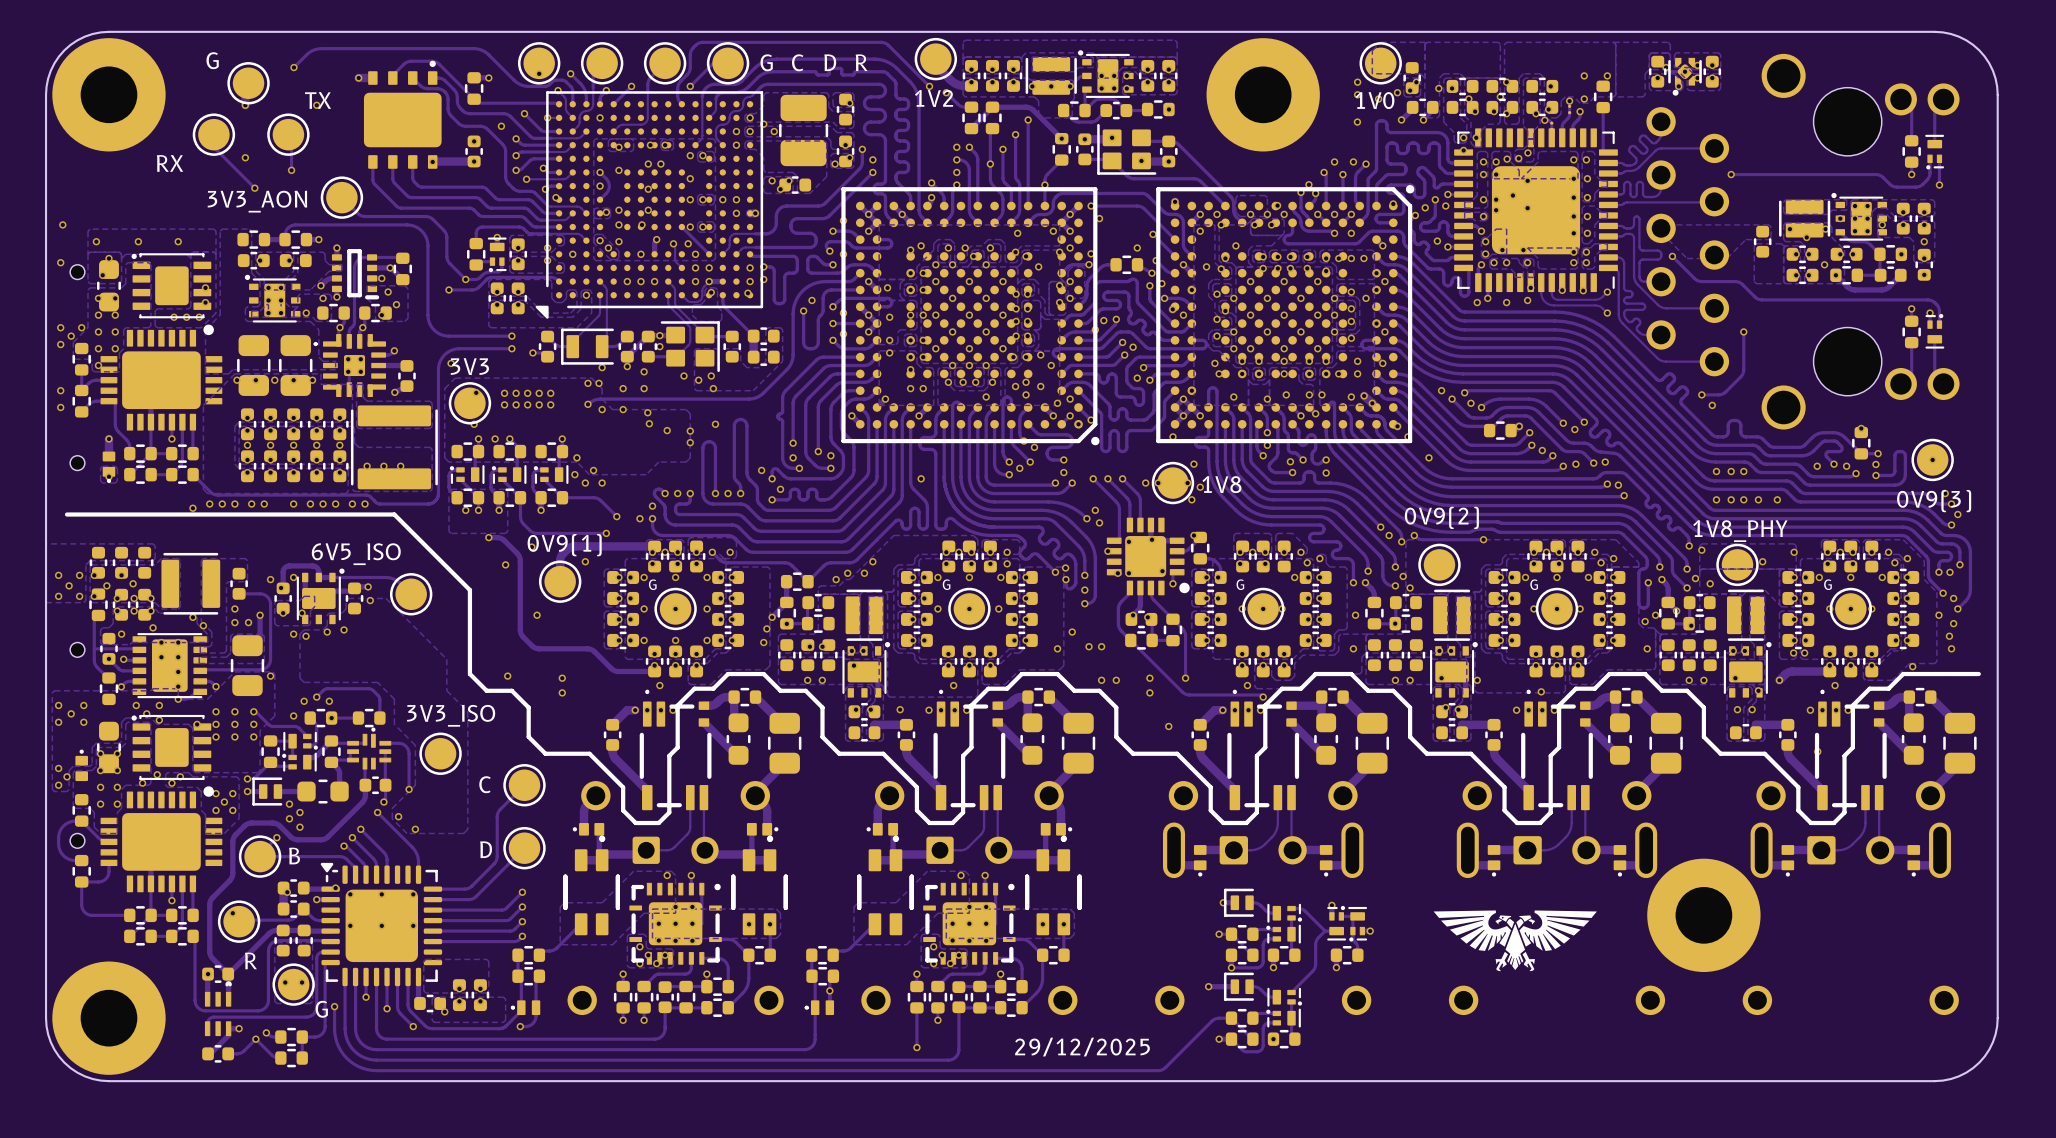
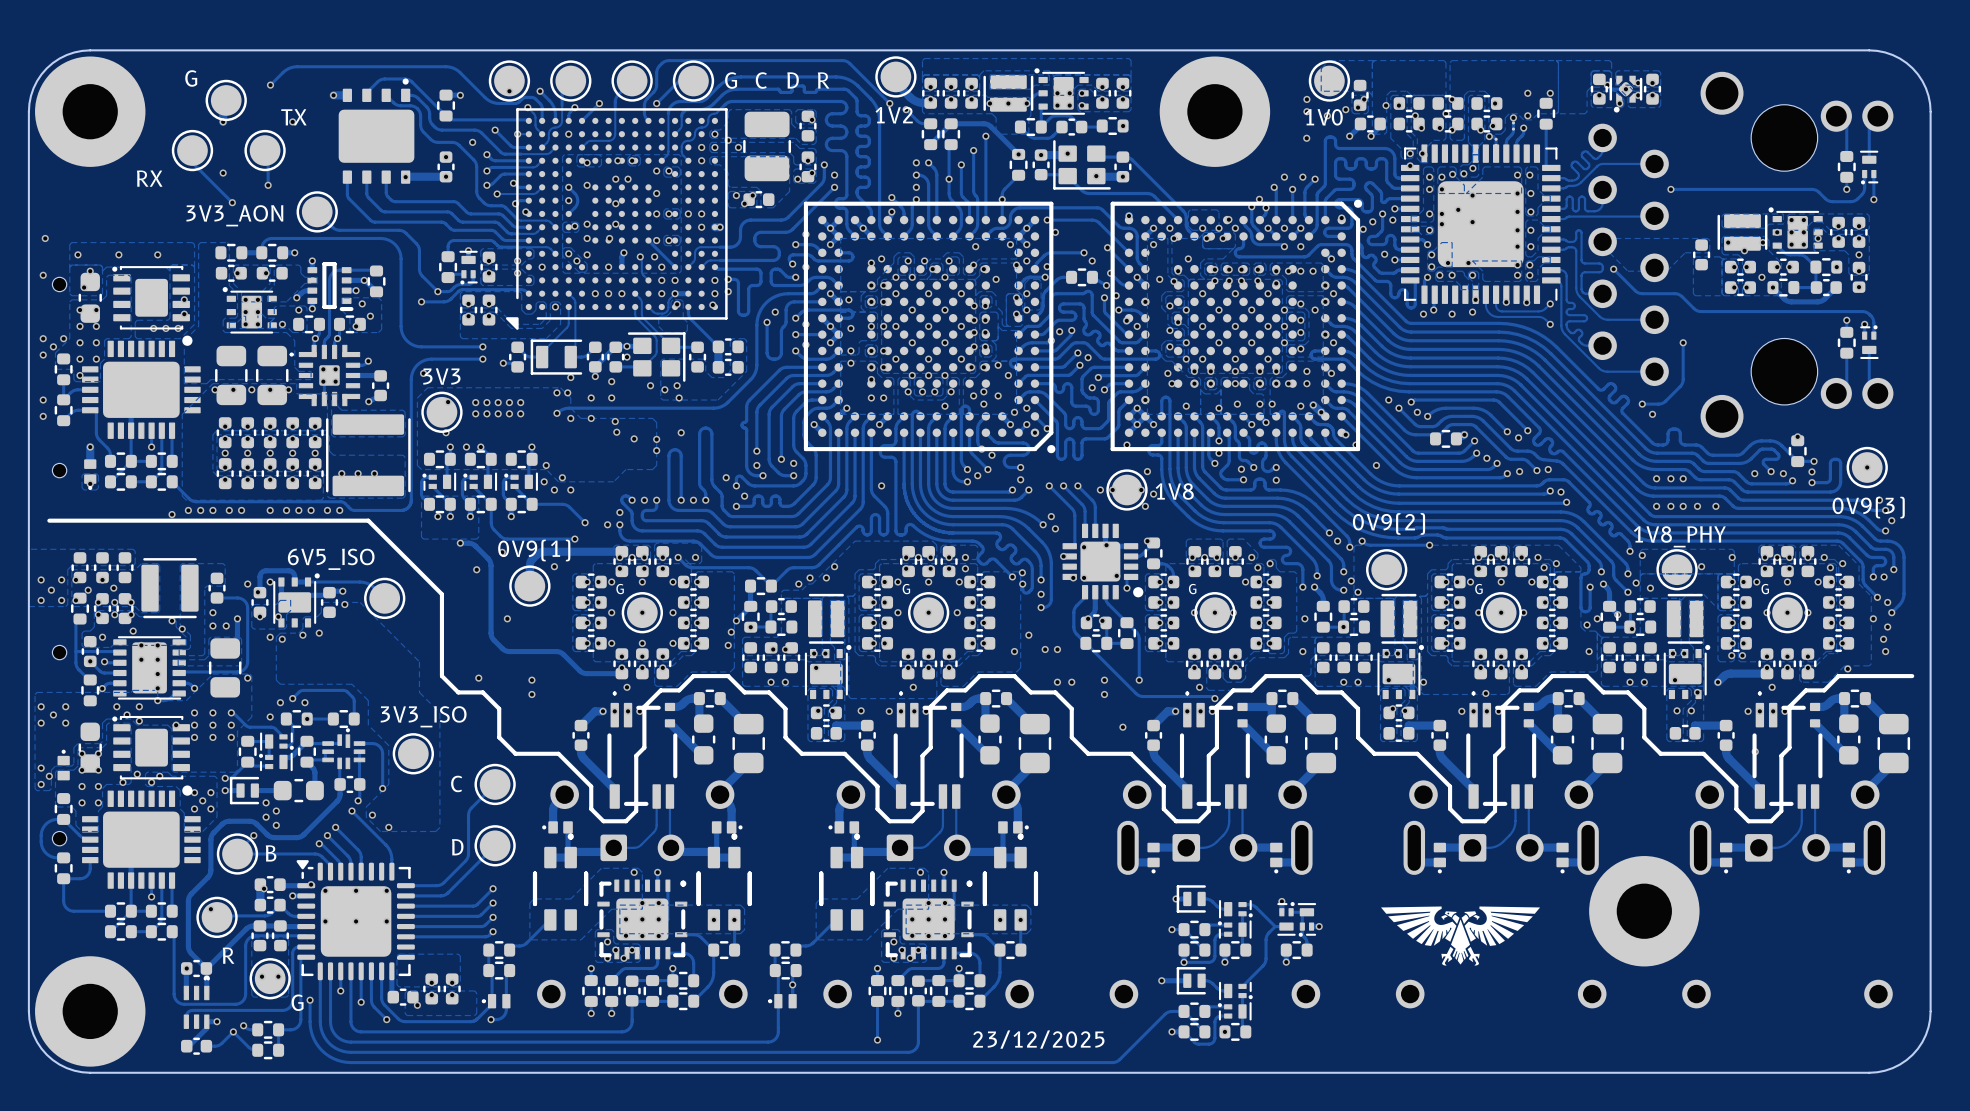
track: none -> (1084, 252) (1048, 253) (1037, 262) (1034, 268)
via: none -> (1084, 252)
text: 29/12/2025 (1082, 1047) -> 23/12/2025 (1038, 1039)

